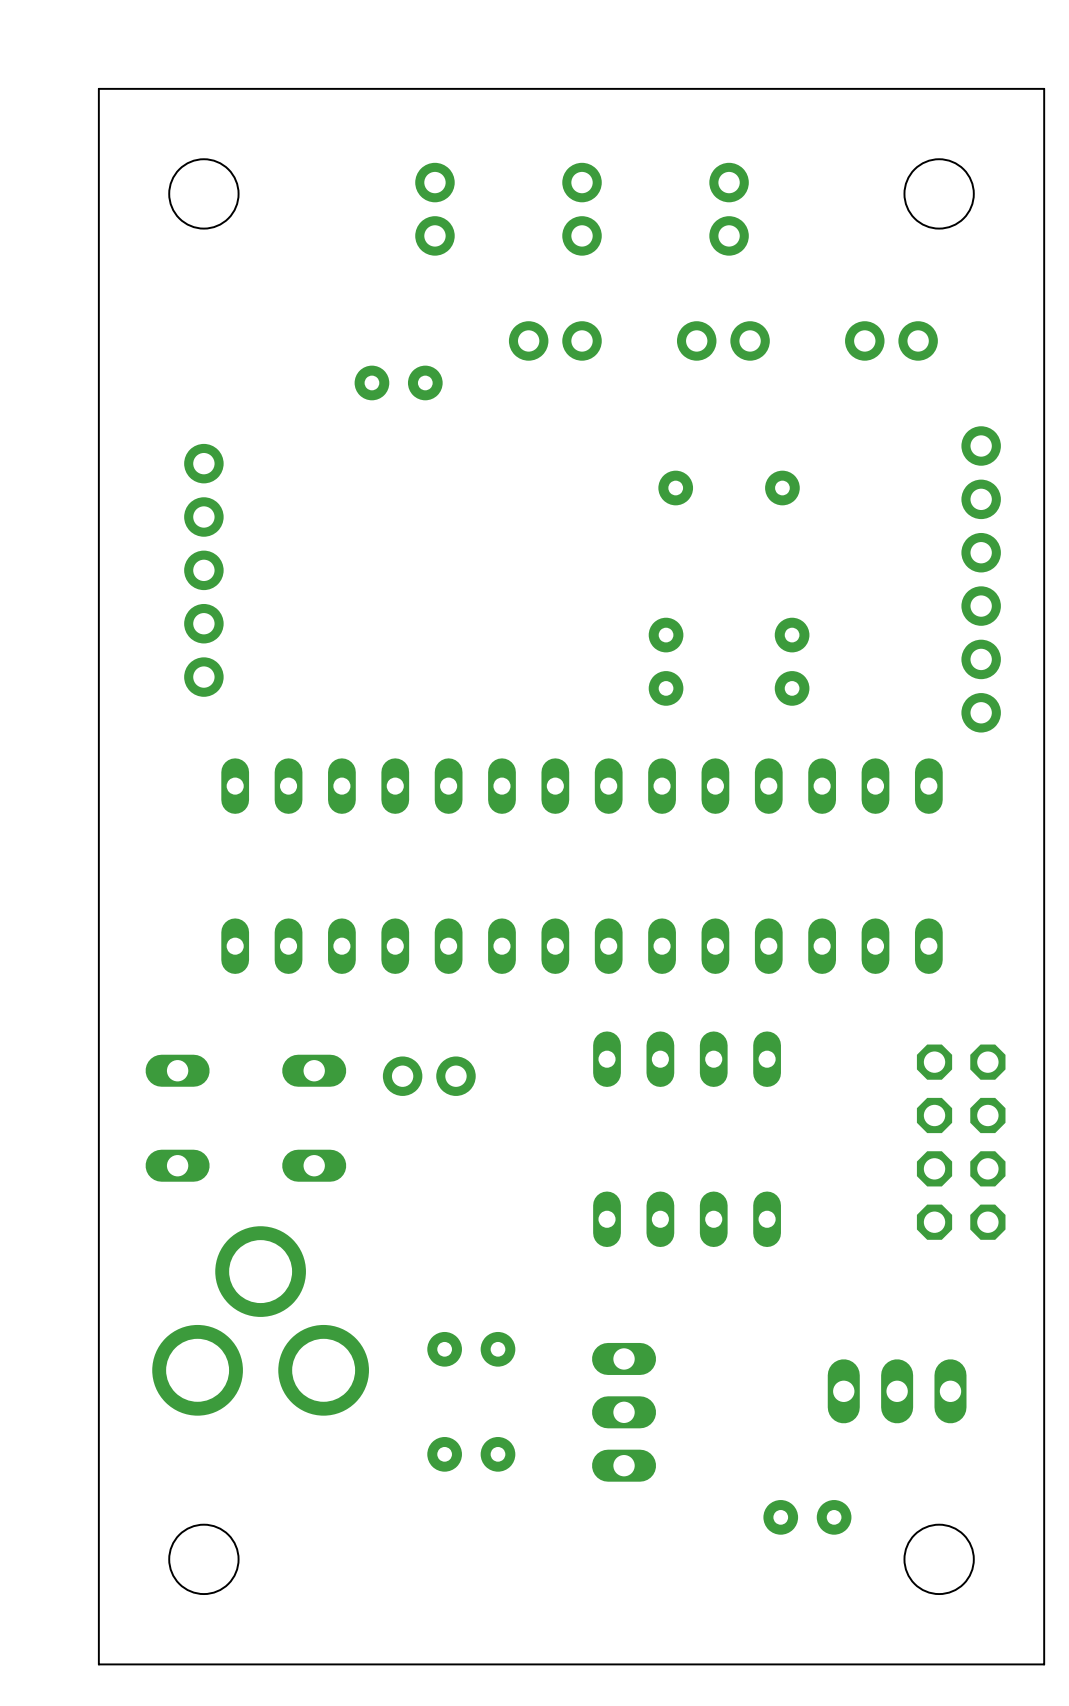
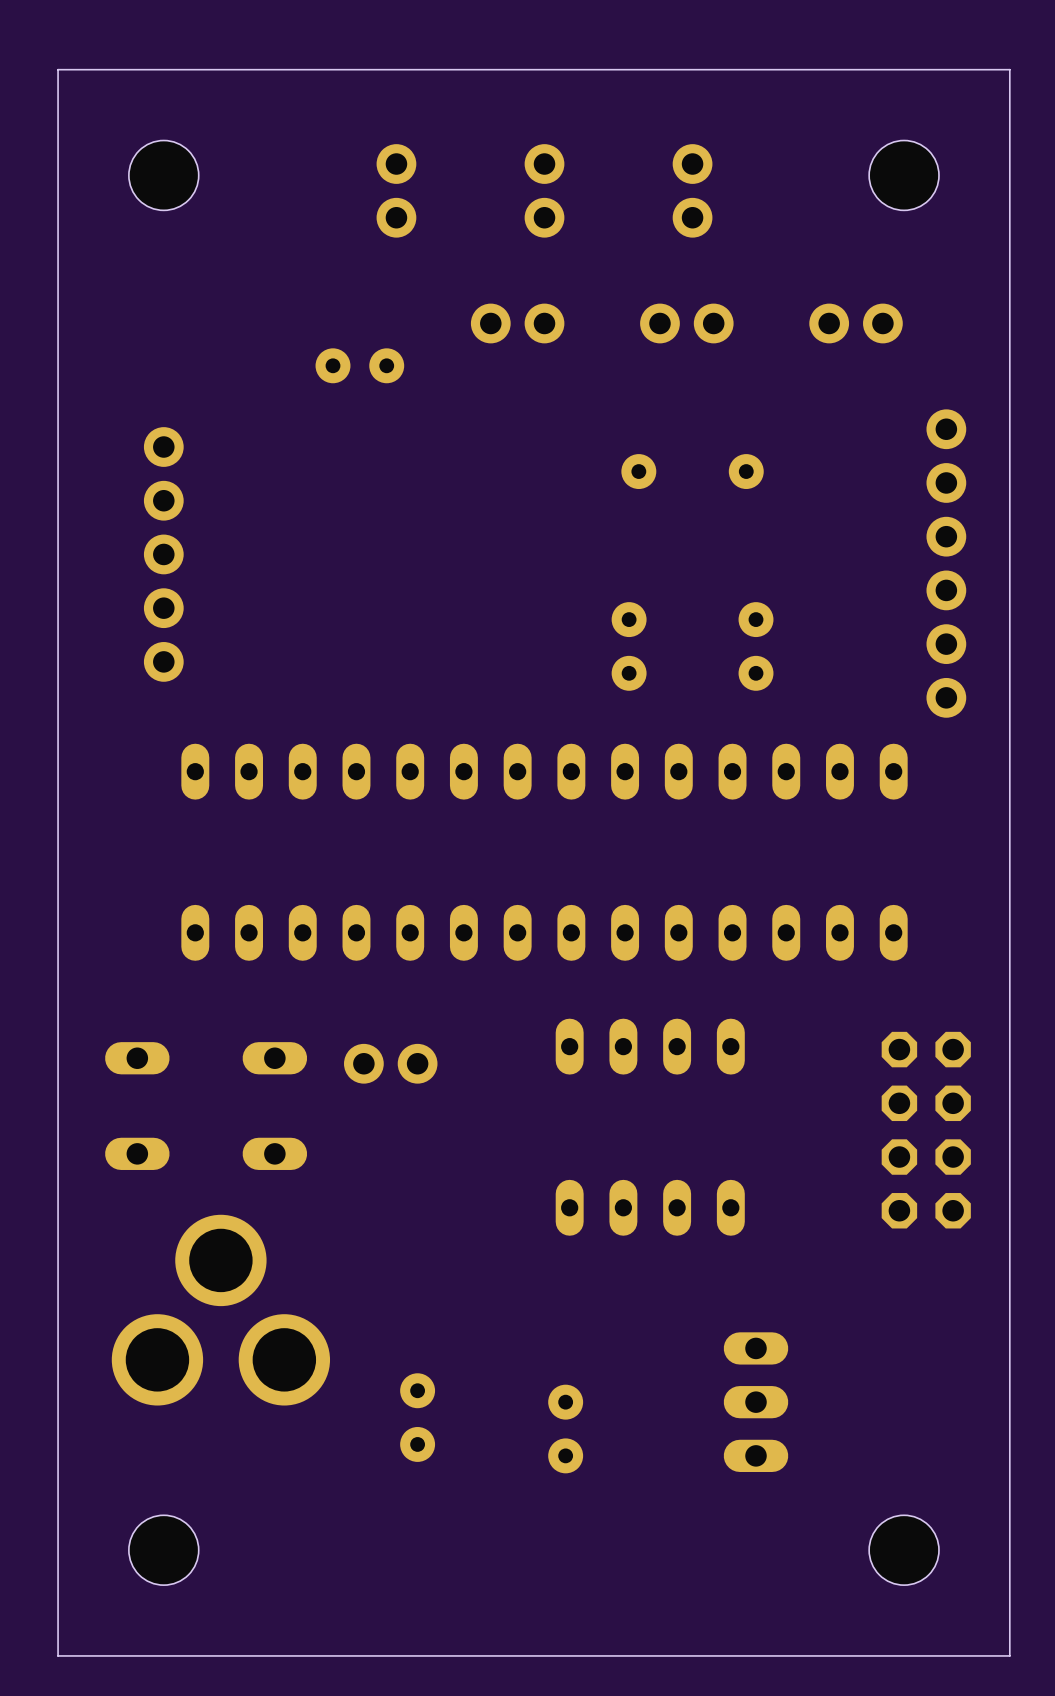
part: (471, 1349) -> none
part: (897, 1391) -> none
part: (624, 1412) -> none
part: none -> (756, 1402)
part: none -> (565, 1429)
part rotation: 0° (471, 1454) -> 90° clockwise (417, 1417)
part: (807, 1517) -> none

